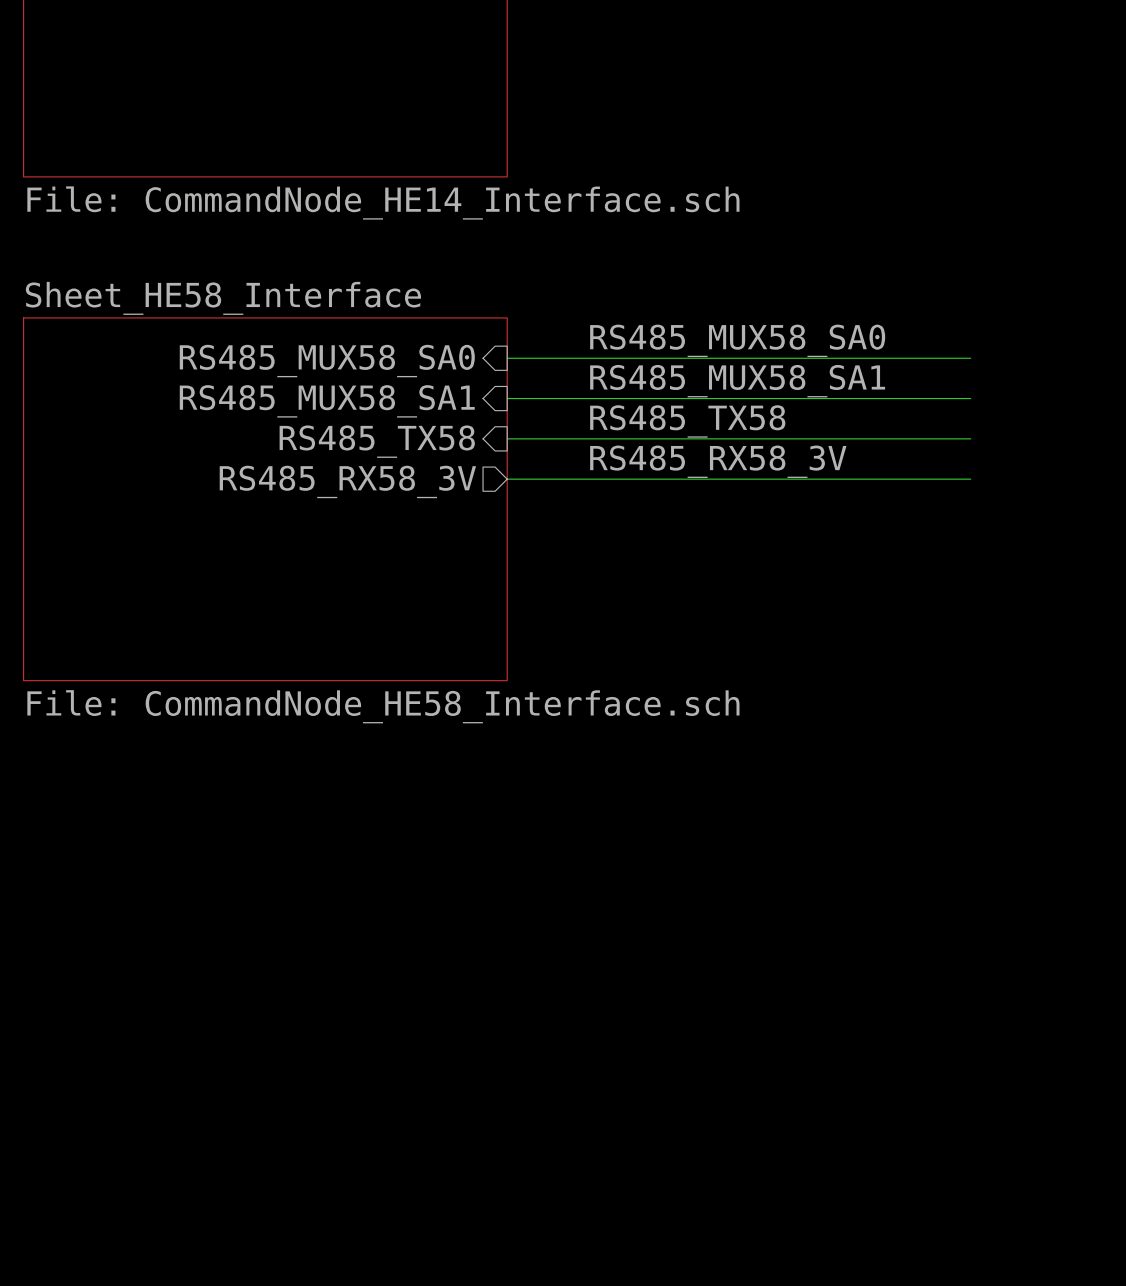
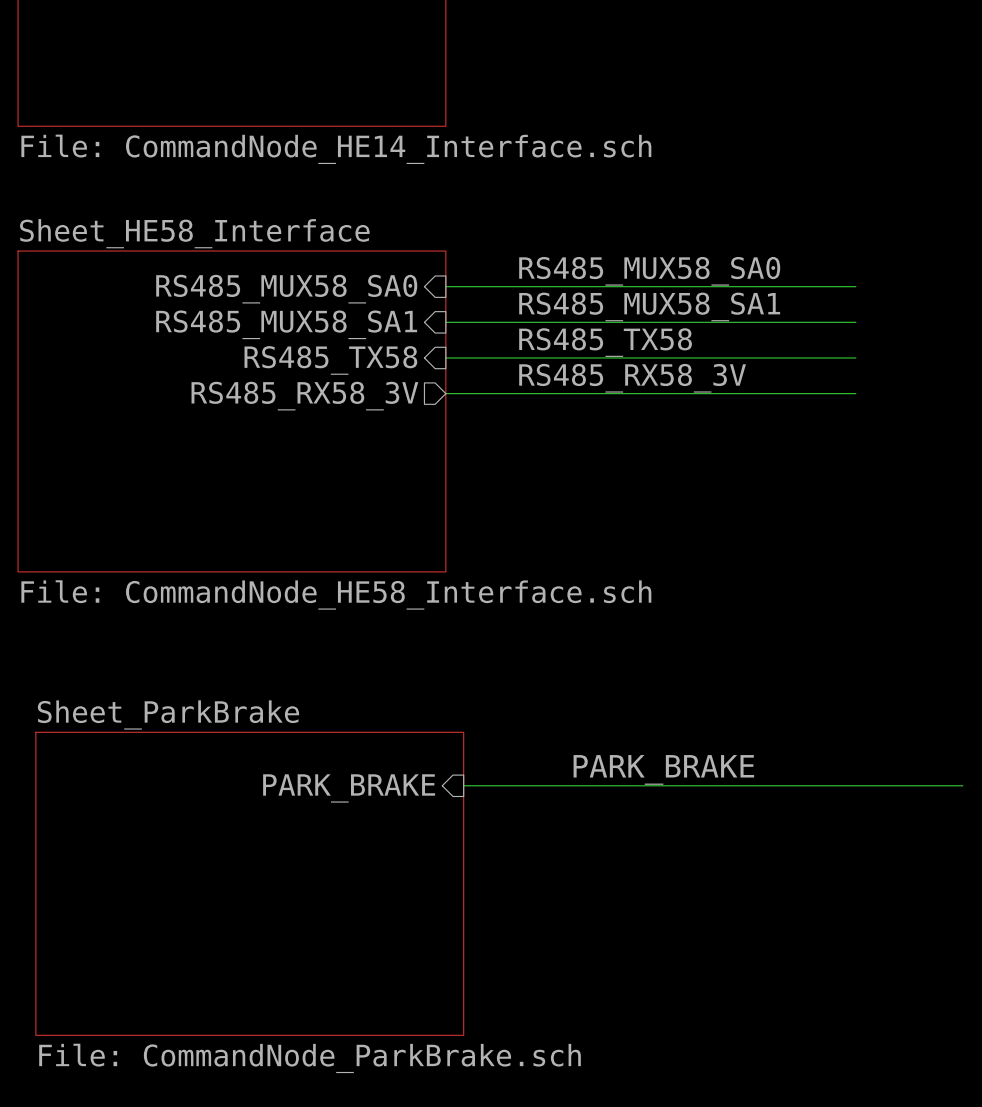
label: none -> PARK_BRAKE (663, 769)
wire: none -> (463, 785) (962, 785)
sheet pin: none -> PARK_BRAKE (349, 788)
sheet Sheet_ParkBrake: none -> File: CommandNode_ParkBrake.sch (249, 883)

